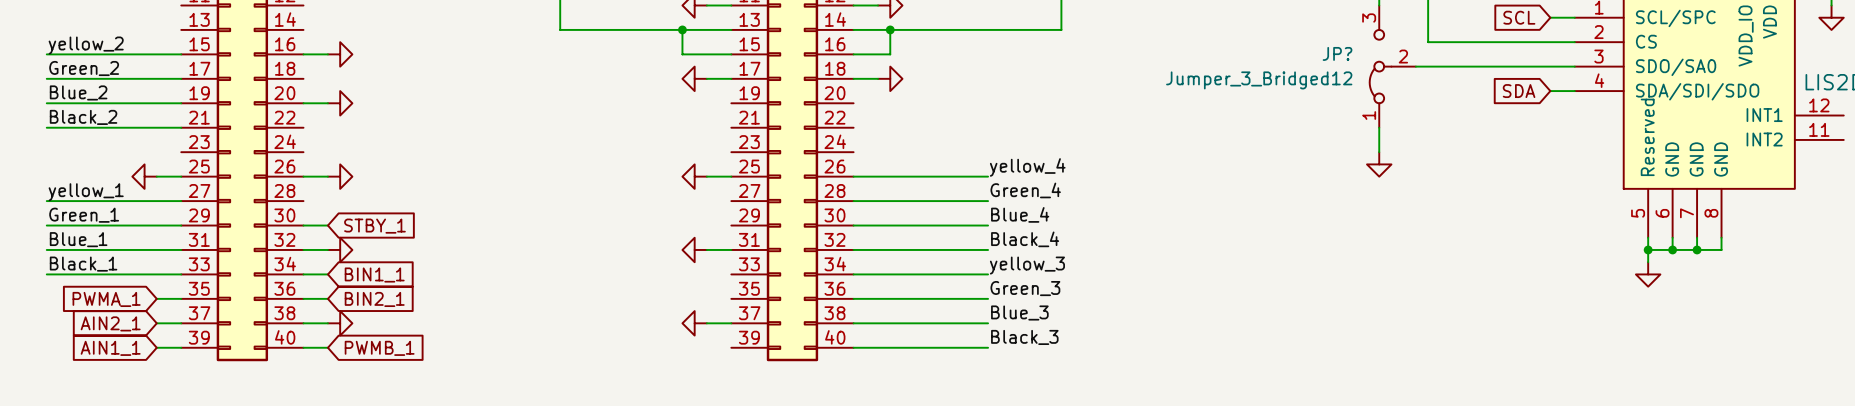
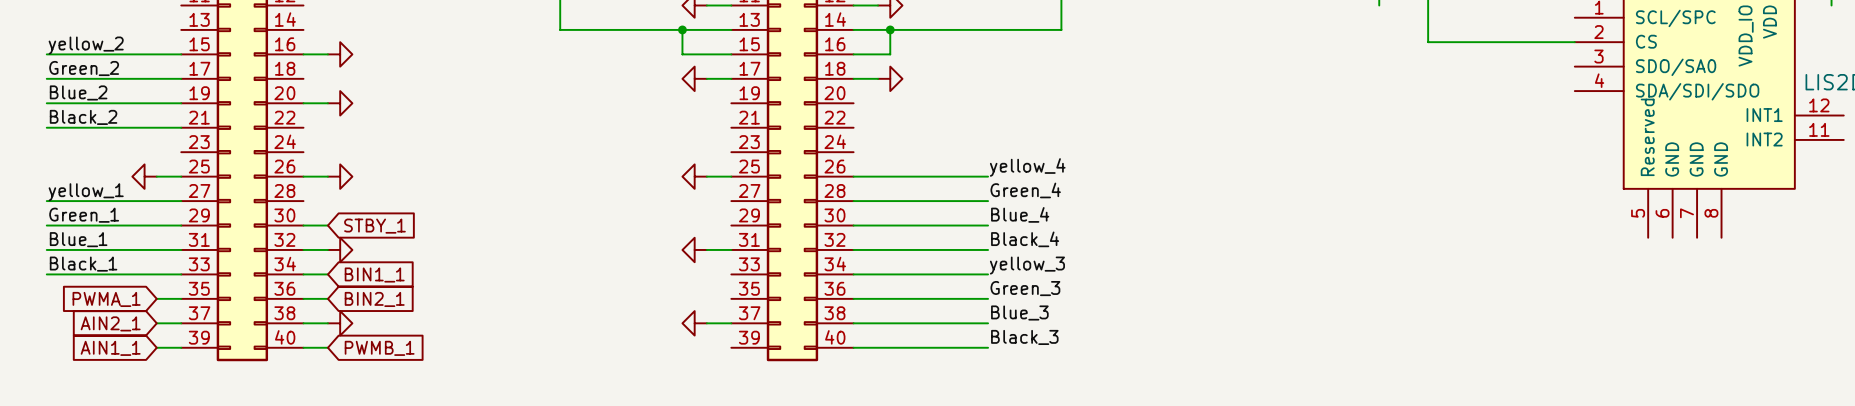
global label: SCL (1519, 17) -> none
wire: (1550, 17) (1574, 17) -> none
power symbol: (1831, 17) -> none
JP?: Jumper_3_Bridged12 (1392, 66) -> none
wire: (1415, 66) (1574, 66) -> none
global label: SDA (1519, 91) -> none
wire: (1550, 91) (1574, 91) -> none
wire: (1379, 127) (1379, 152) -> none
power symbol: (1379, 164) -> none
wire: (1648, 237) (1648, 262) -> none
wire: (1672, 237) (1672, 249) -> none
wire: (1697, 237) (1697, 249) -> none
wire: (1721, 237) (1721, 249) (1648, 249) -> none
junction: (1648, 249) -> none
junction: (1672, 249) -> none
junction: (1697, 249) -> none
power symbol: (1648, 274) -> none

